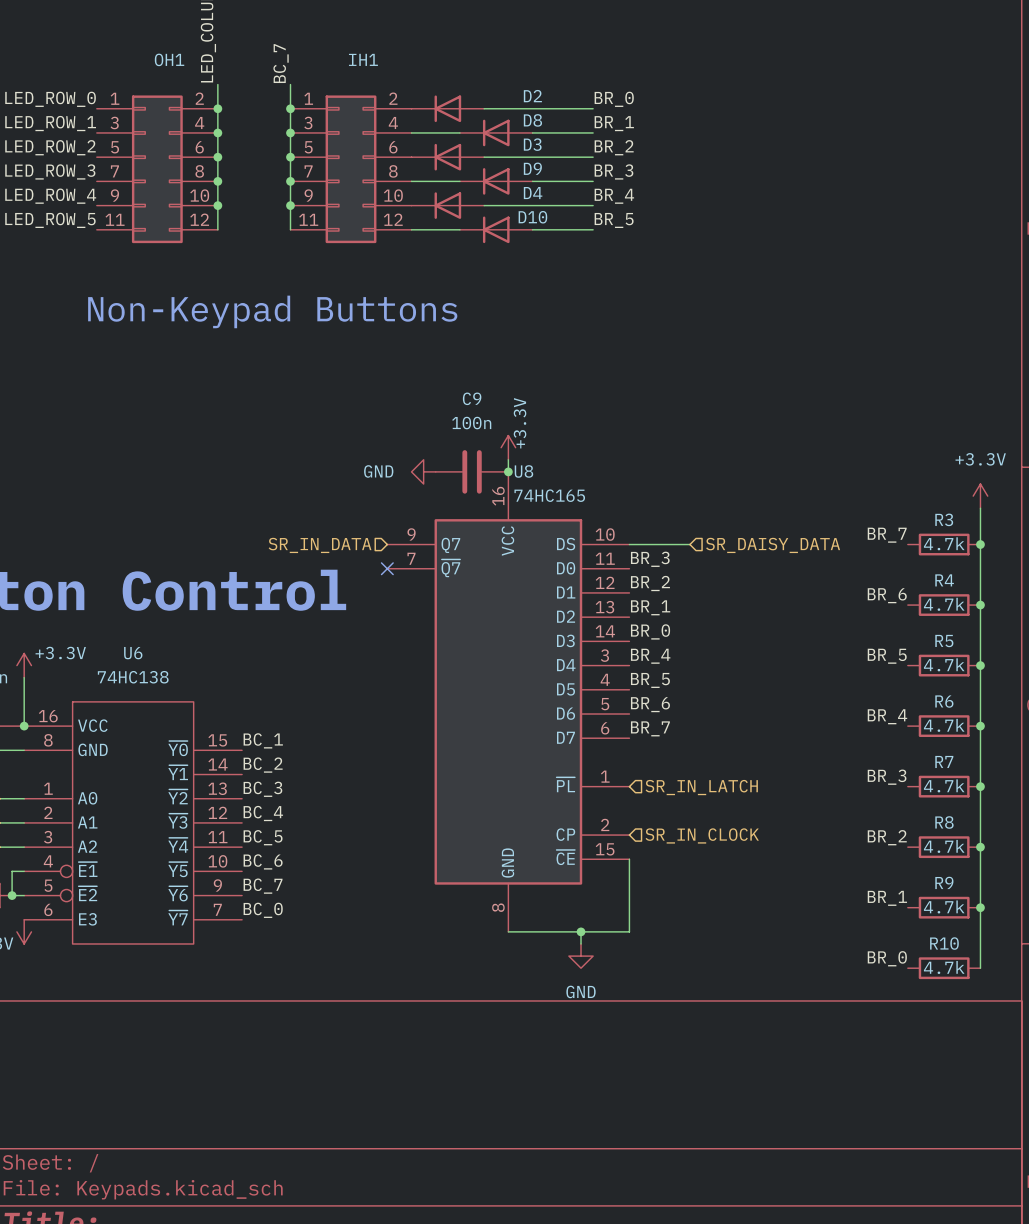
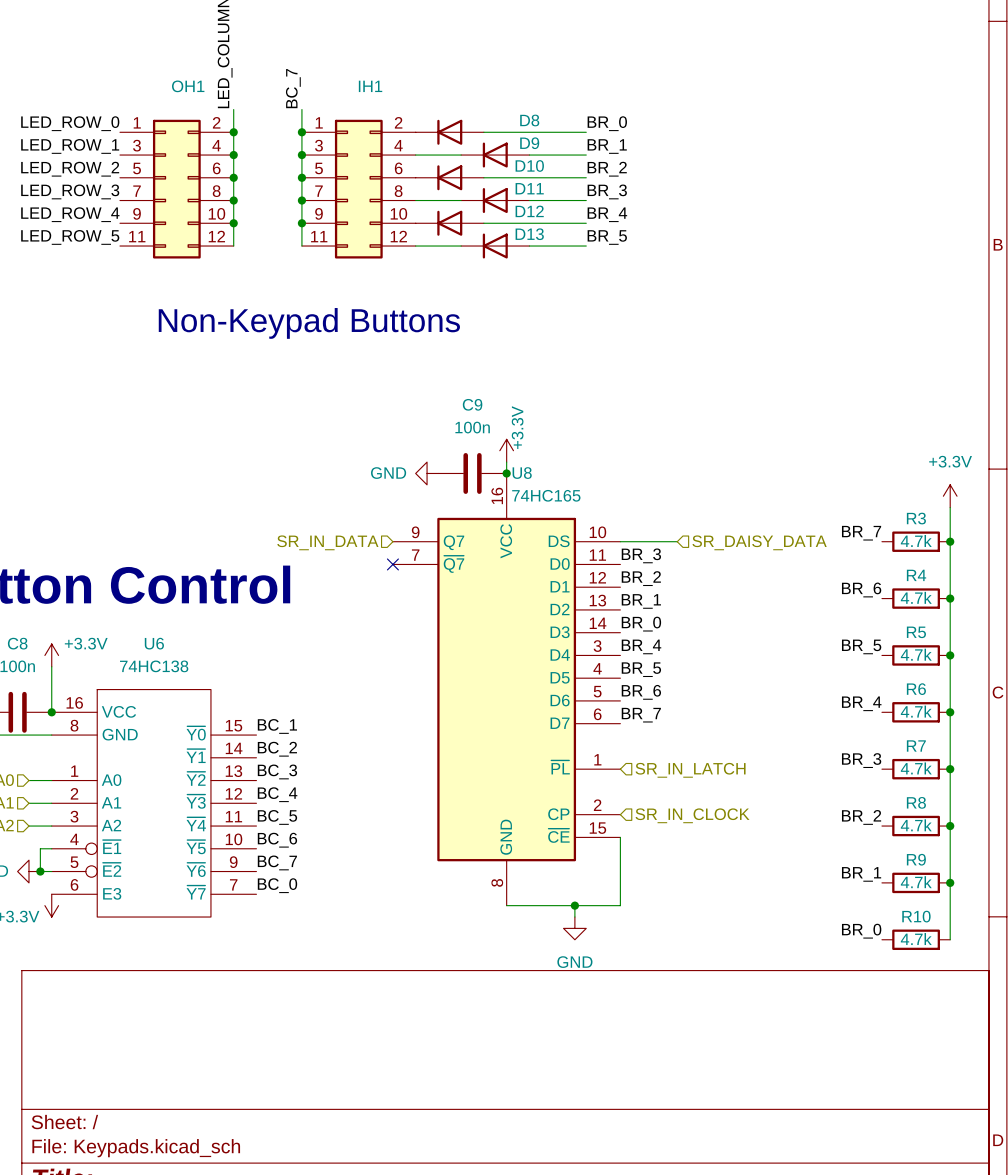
D2 name: D2 (532, 96) -> D8 (529, 120)
D8 name: D8 (532, 120) -> D9 (529, 143)
D3 name: D3 (532, 144) -> D10 (529, 165)
D9 name: D9 (532, 168) -> D11 (529, 188)
D4 name: D4 (533, 193) -> D12 (529, 211)
D10 name: D10 (532, 217) -> D13 (529, 234)

